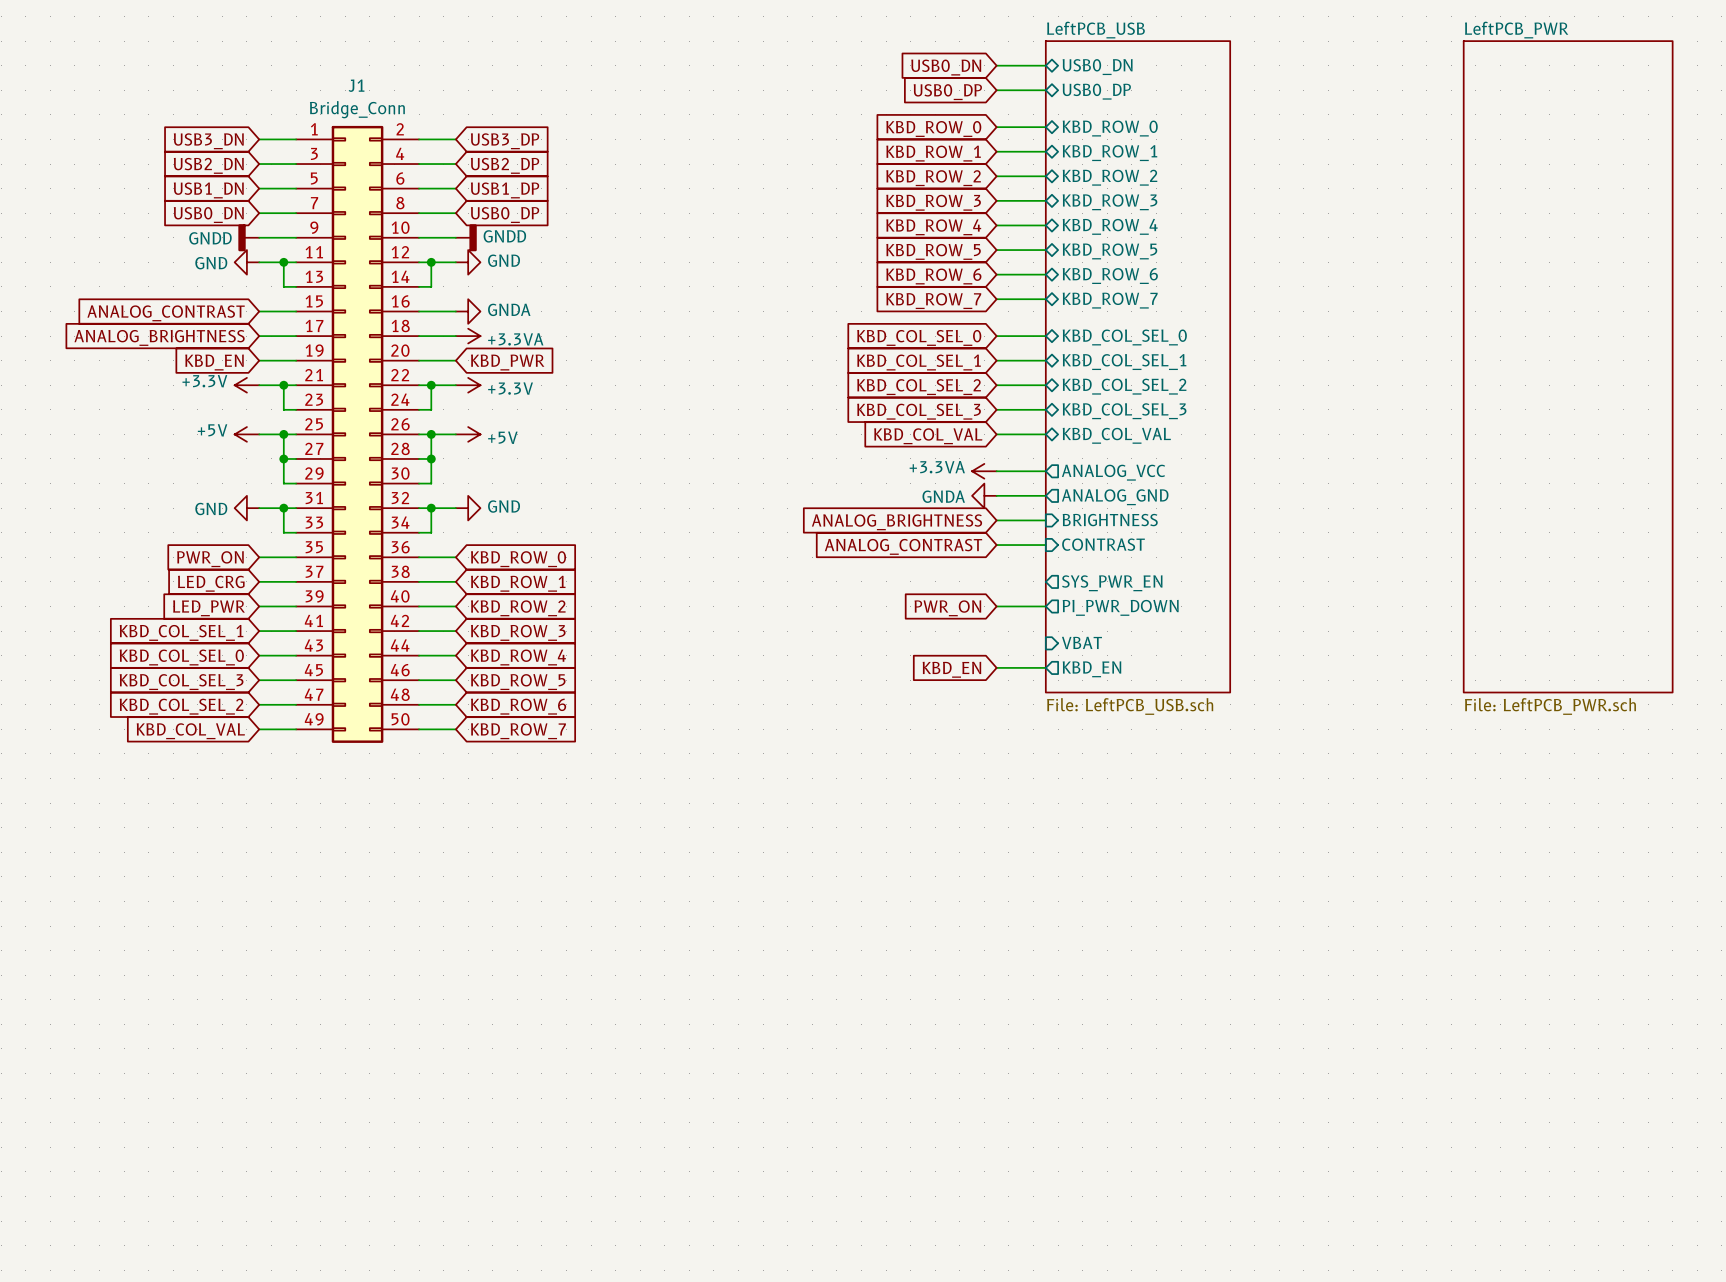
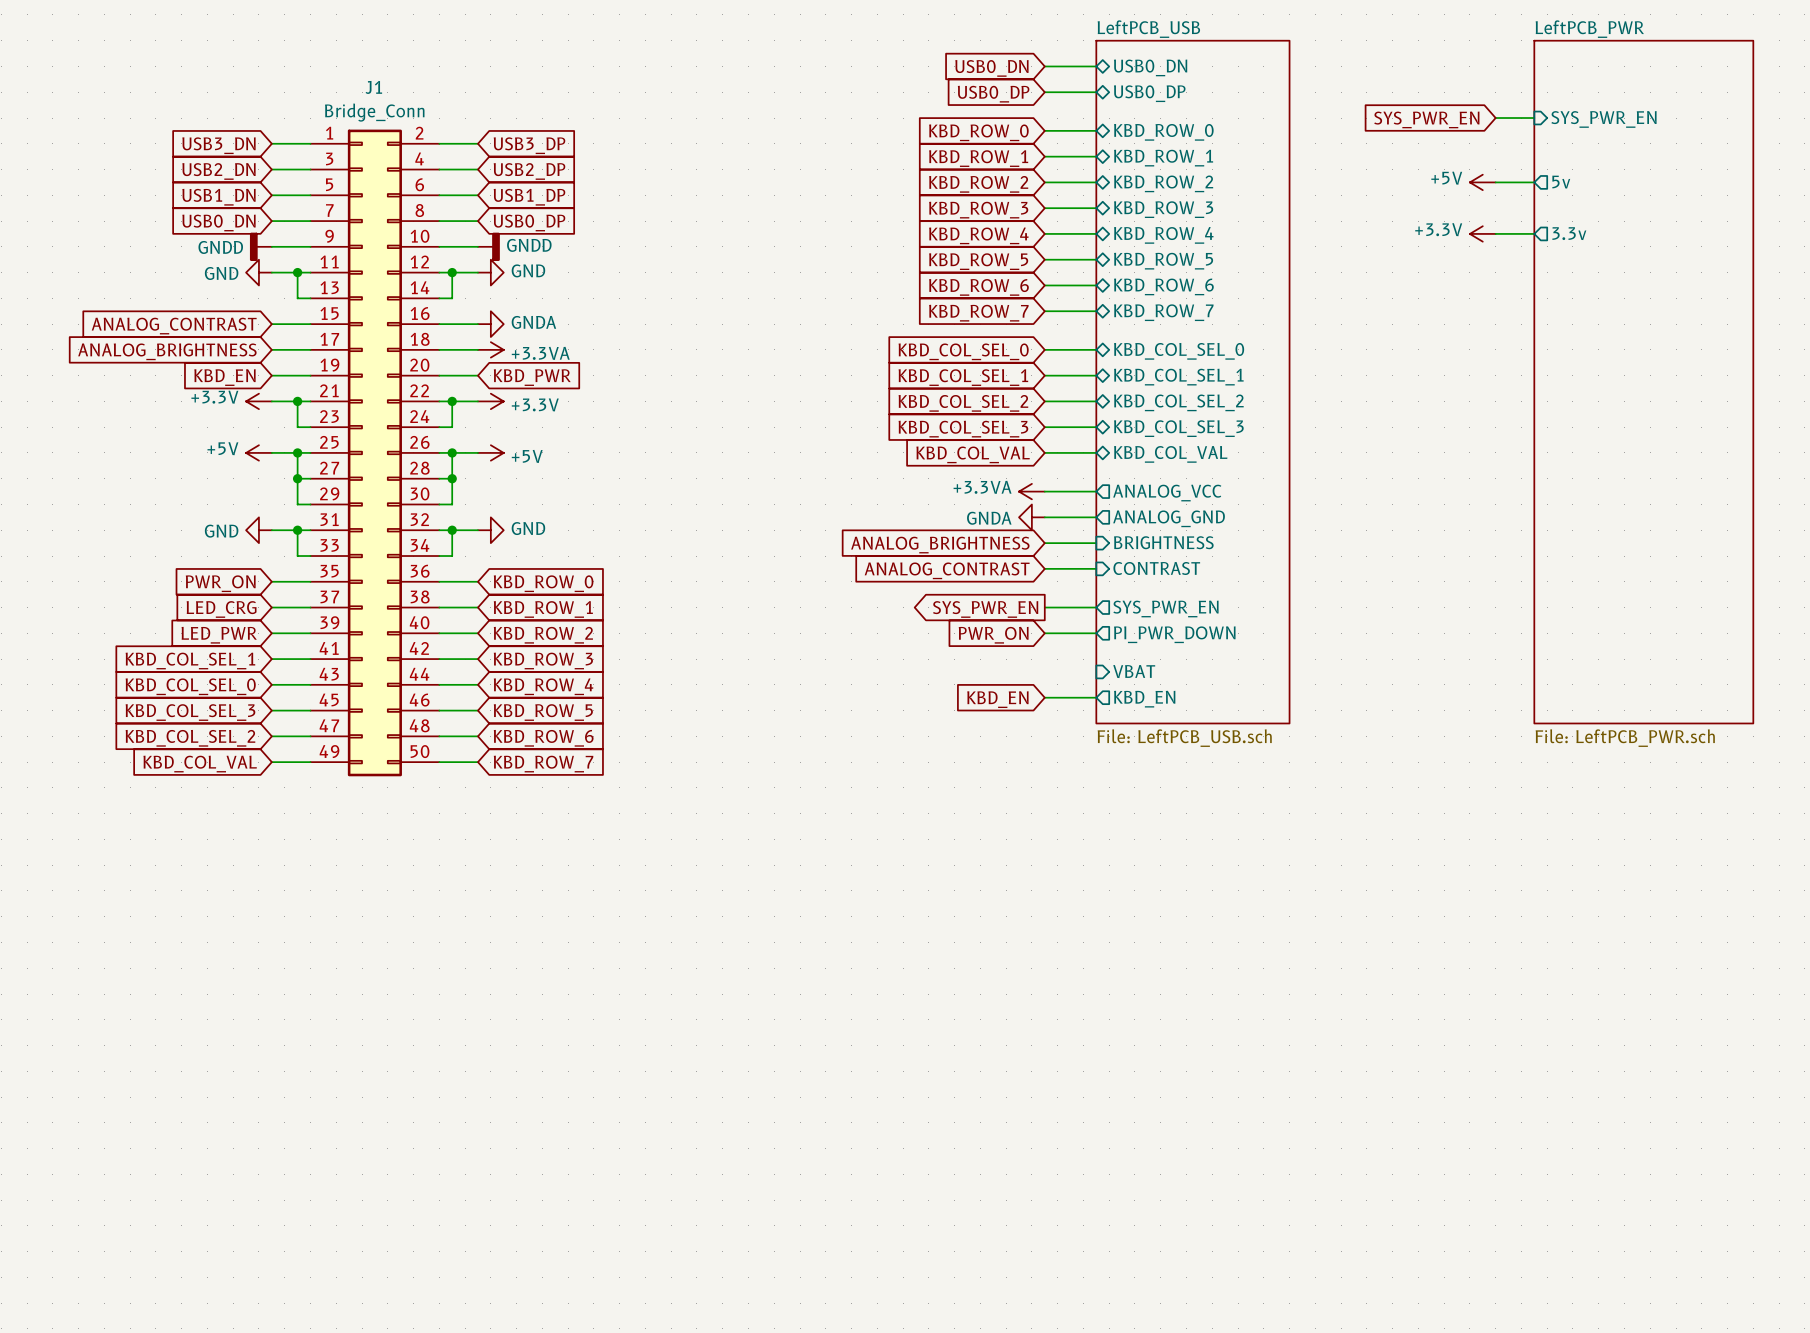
wire: none -> (1495, 118) (1534, 118)
global label: none -> SYS_PWR_EN (1426, 119)
sheet pin: none -> SYS_PWR_EN (1603, 119)
power symbol: none -> +5V (1482, 182)
wire: none -> (1495, 182) (1534, 182)
sheet pin: none -> 5v (1561, 182)
power symbol: none -> +3.3V (1482, 233)
wire: none -> (1495, 233) (1534, 233)
sheet pin: none -> 3.3v (1569, 233)
wire: none -> (1044, 607) (1096, 607)
global label: none -> SYS_PWR_EN (985, 609)

